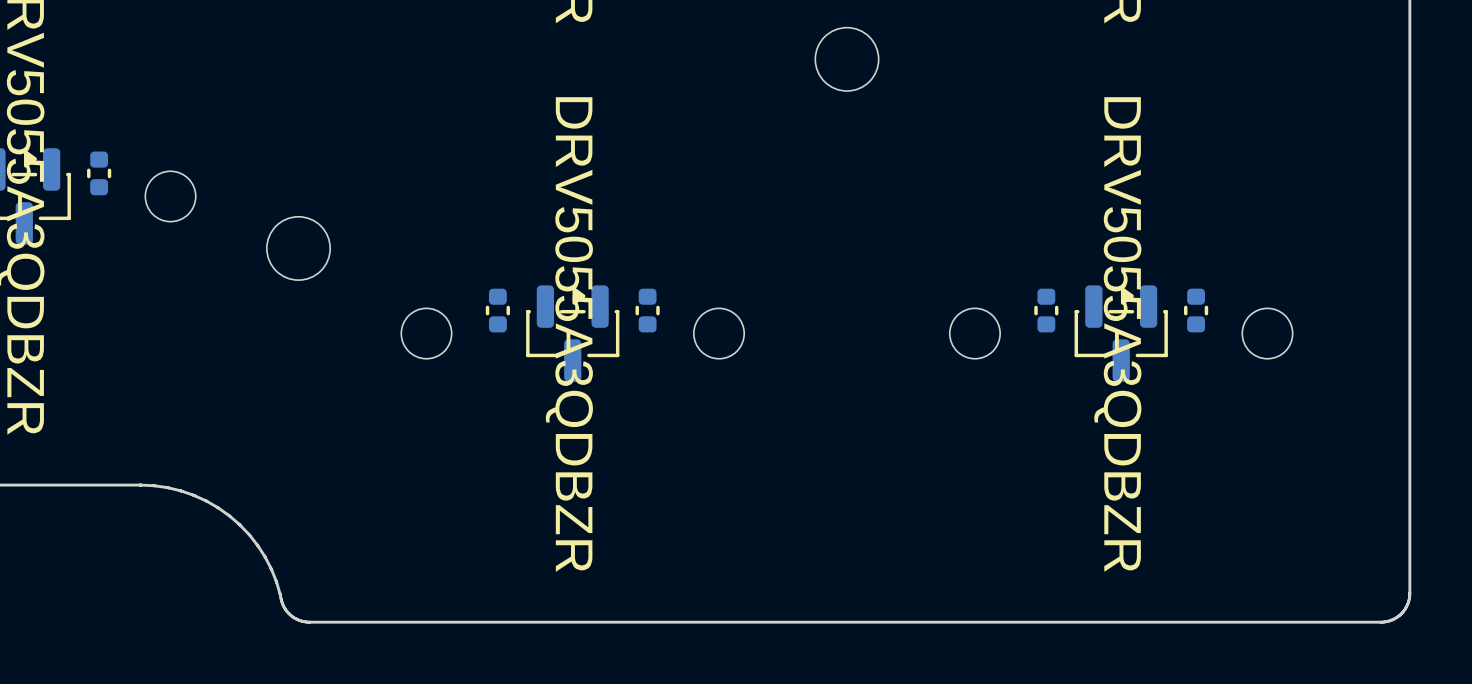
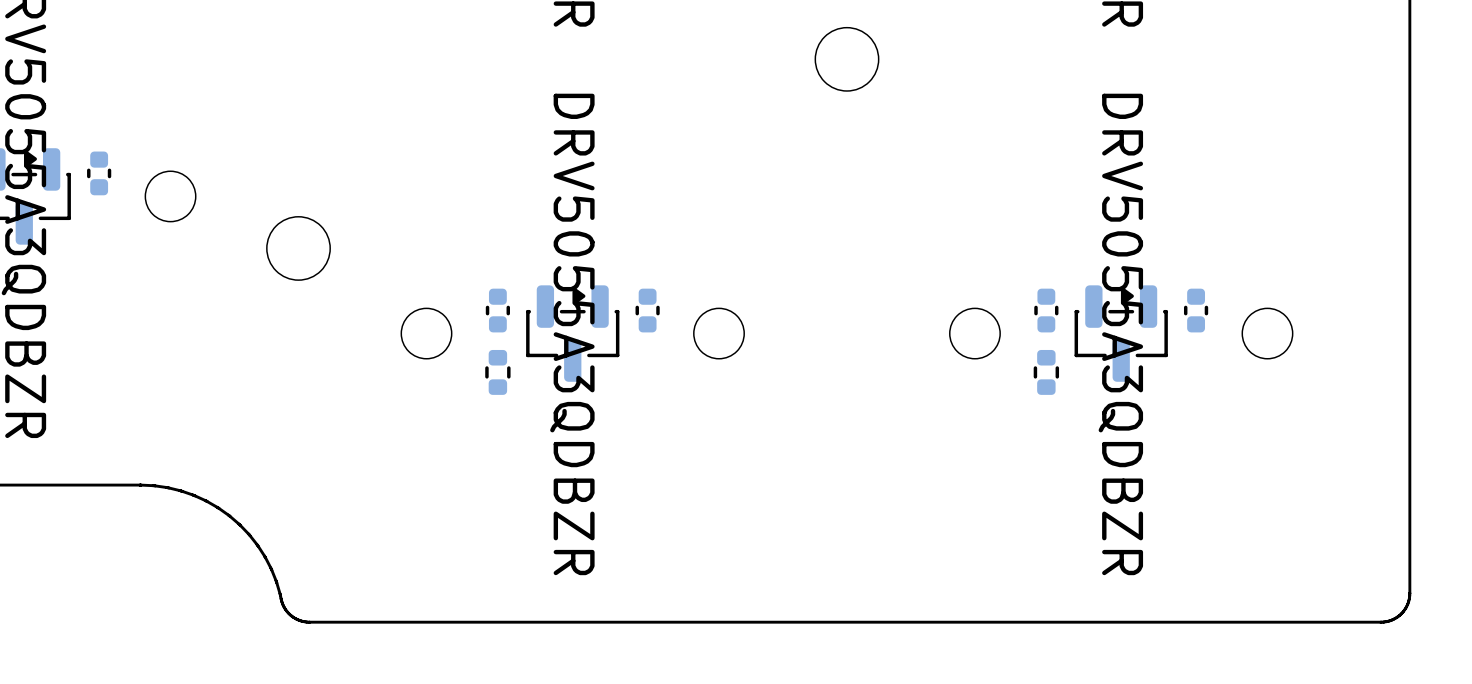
part: none -> (497, 372)
part: none -> (1046, 372)

